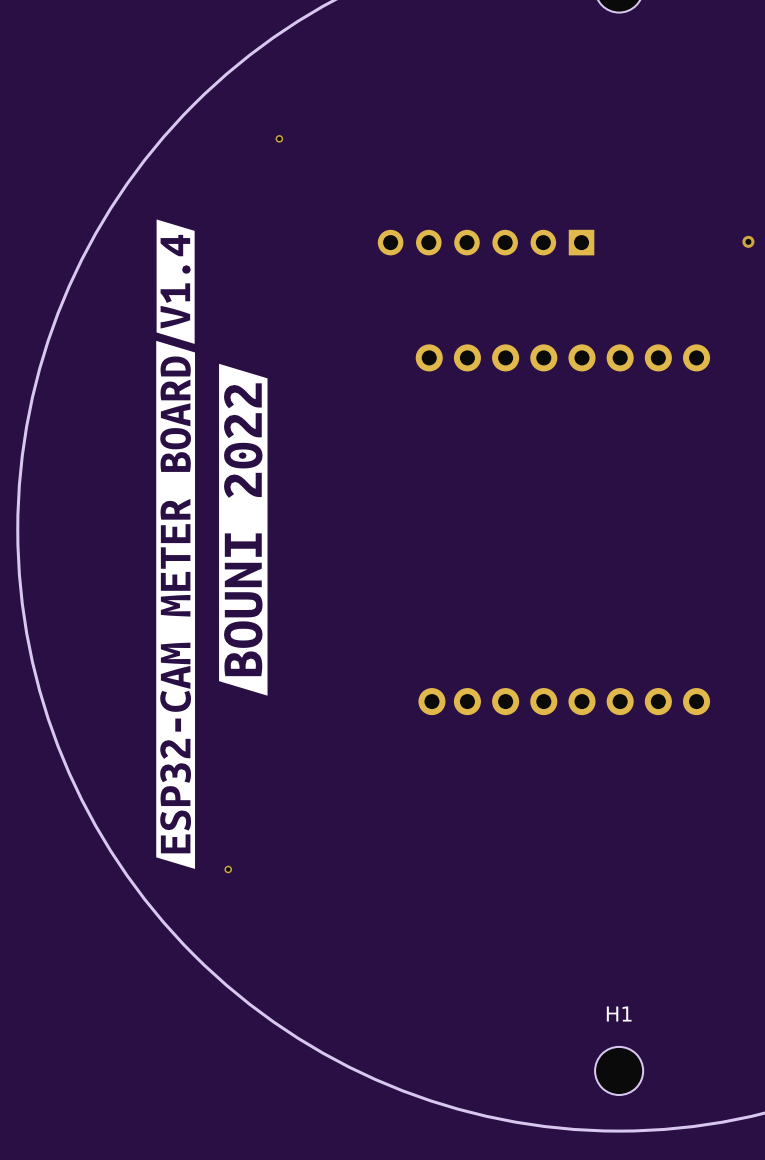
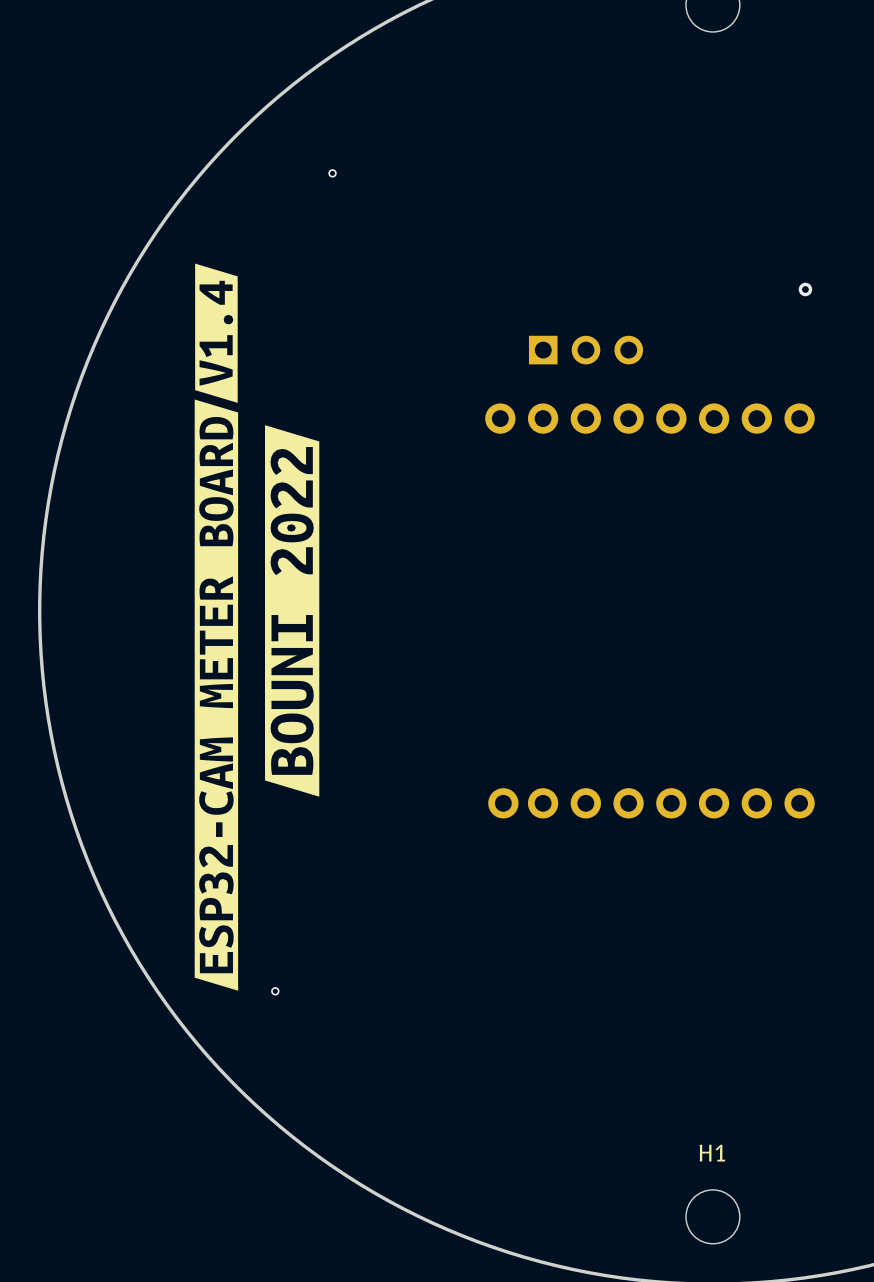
via position: (748, 241) -> (805, 289)
part: (486, 242) -> none
part: none -> (586, 350)

